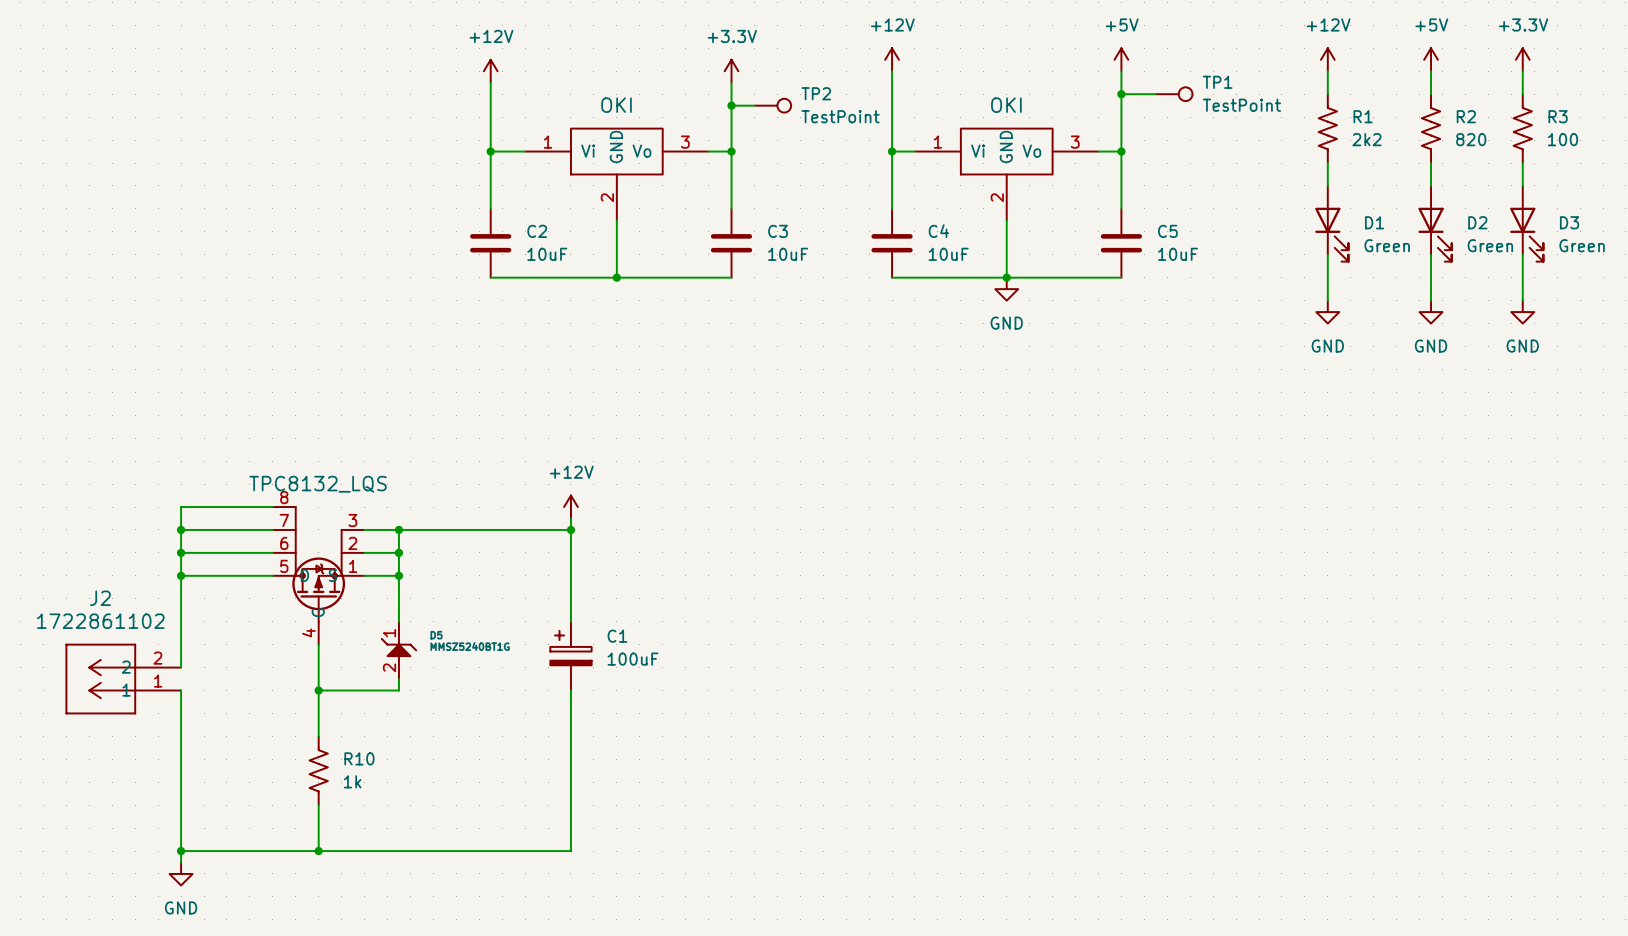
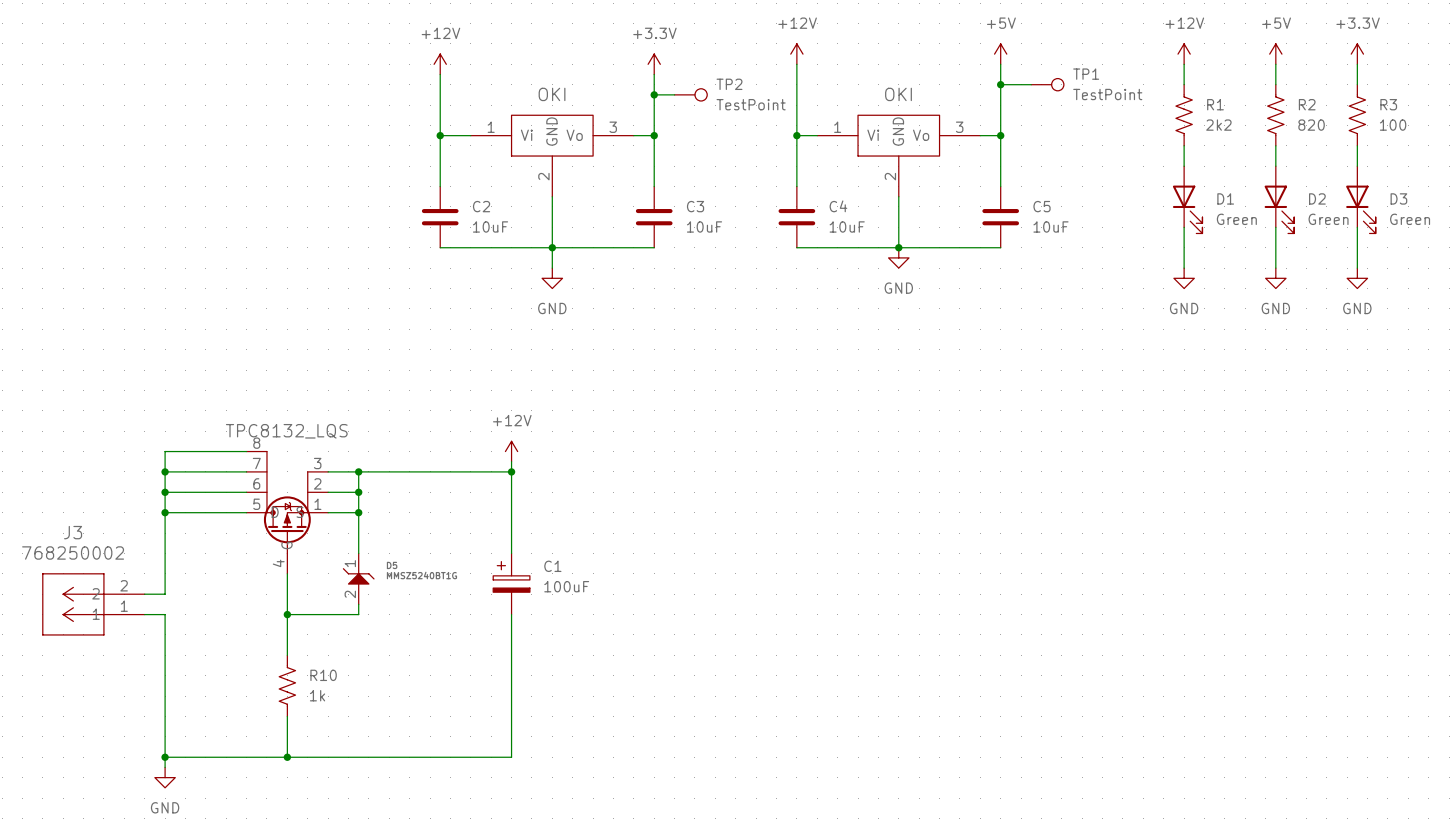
wire: none -> (552, 247) (552, 268)
power symbol: none -> GND (552, 278)
J3: none -> 768250002 (93, 604)
J2: 1722861102 (123, 679) -> none

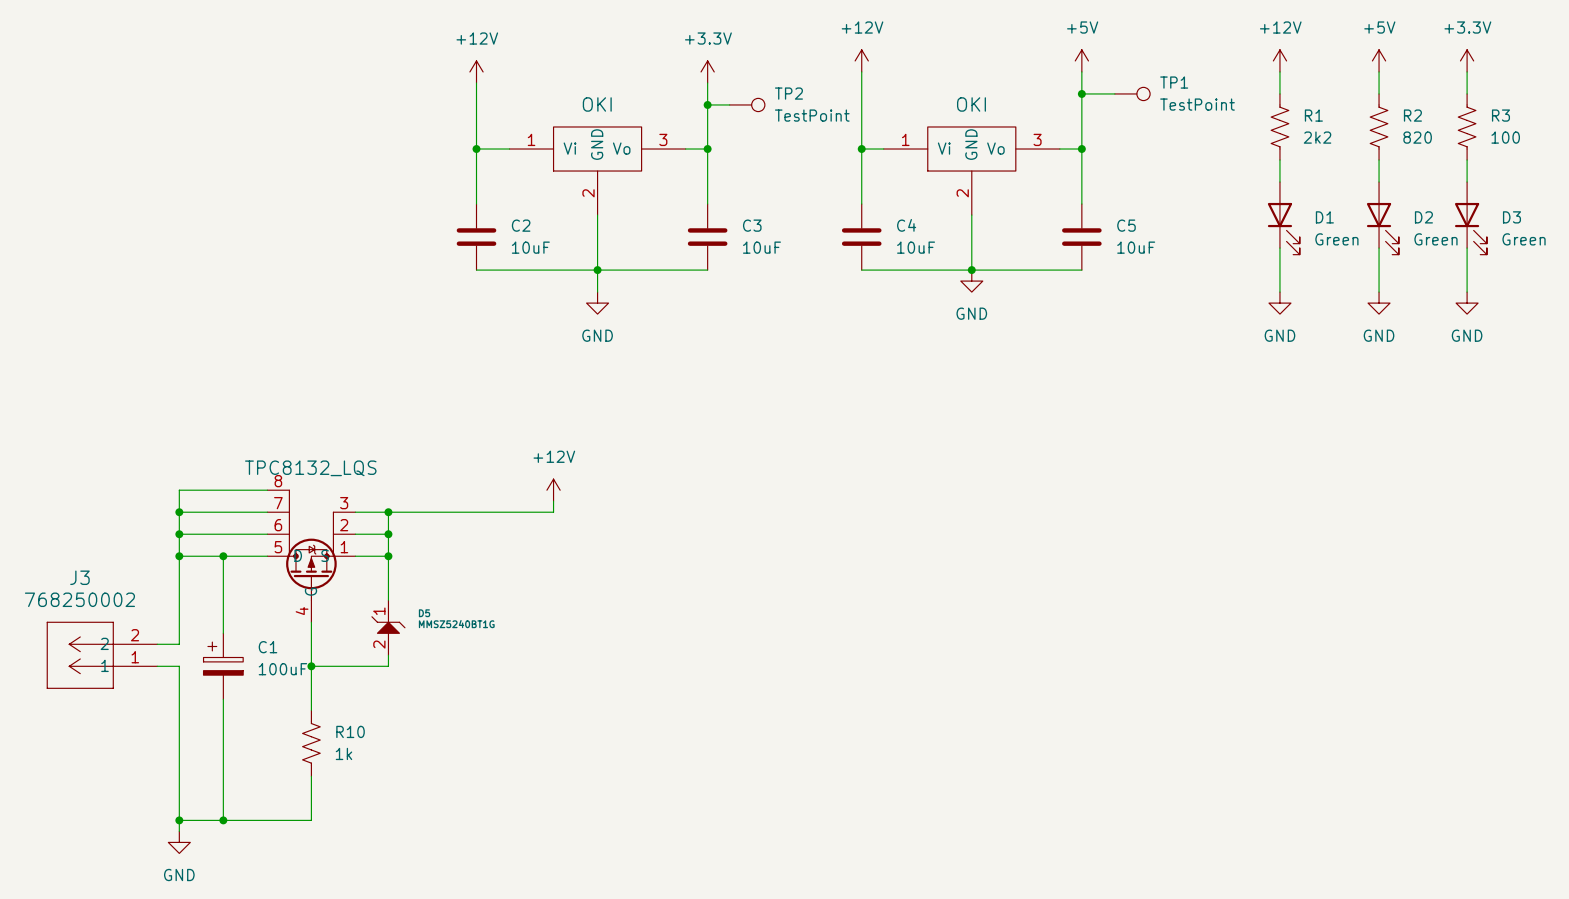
wire: (511, 471) (511, 553) -> none
junction: (511, 471) -> none
wire: none -> (223, 556) (223, 633)
junction: none -> (223, 556)
C1 position: (511, 584) -> (223, 666)
wire: (511, 614) (511, 757) (287, 757) -> none
wire: none -> (223, 699) (223, 820)
junction: none -> (223, 820)
junction: (287, 757) -> none

